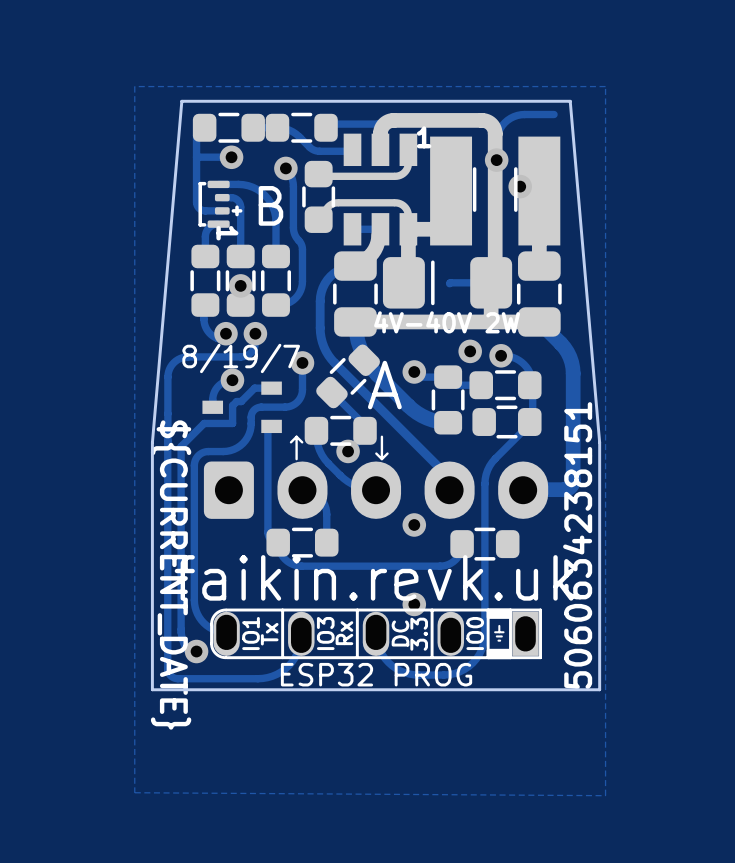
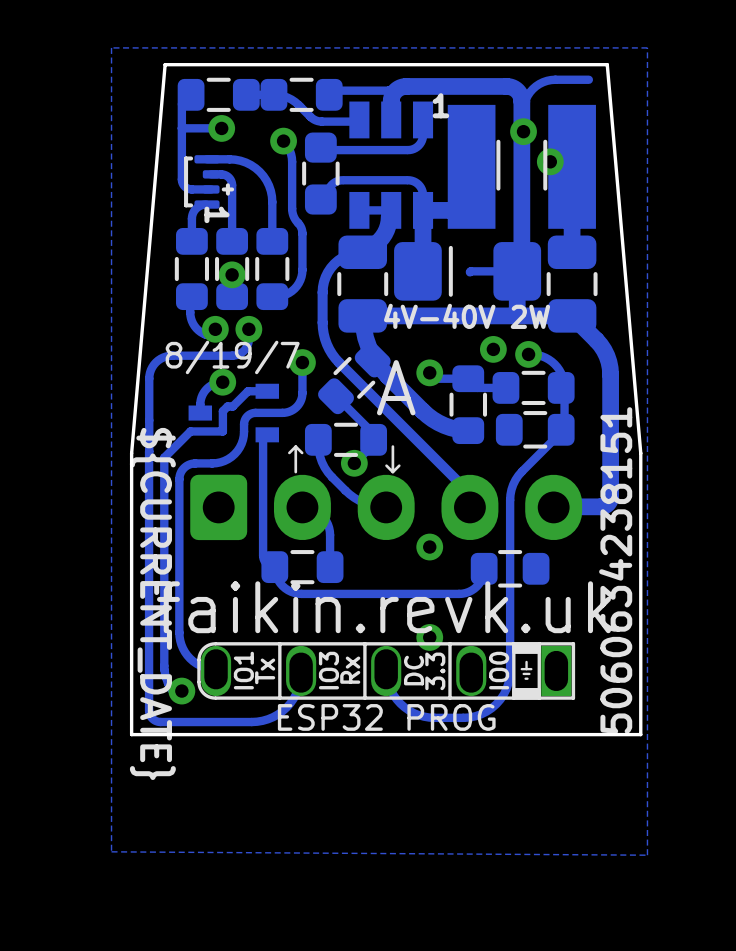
text: B (270, 205) -> none

